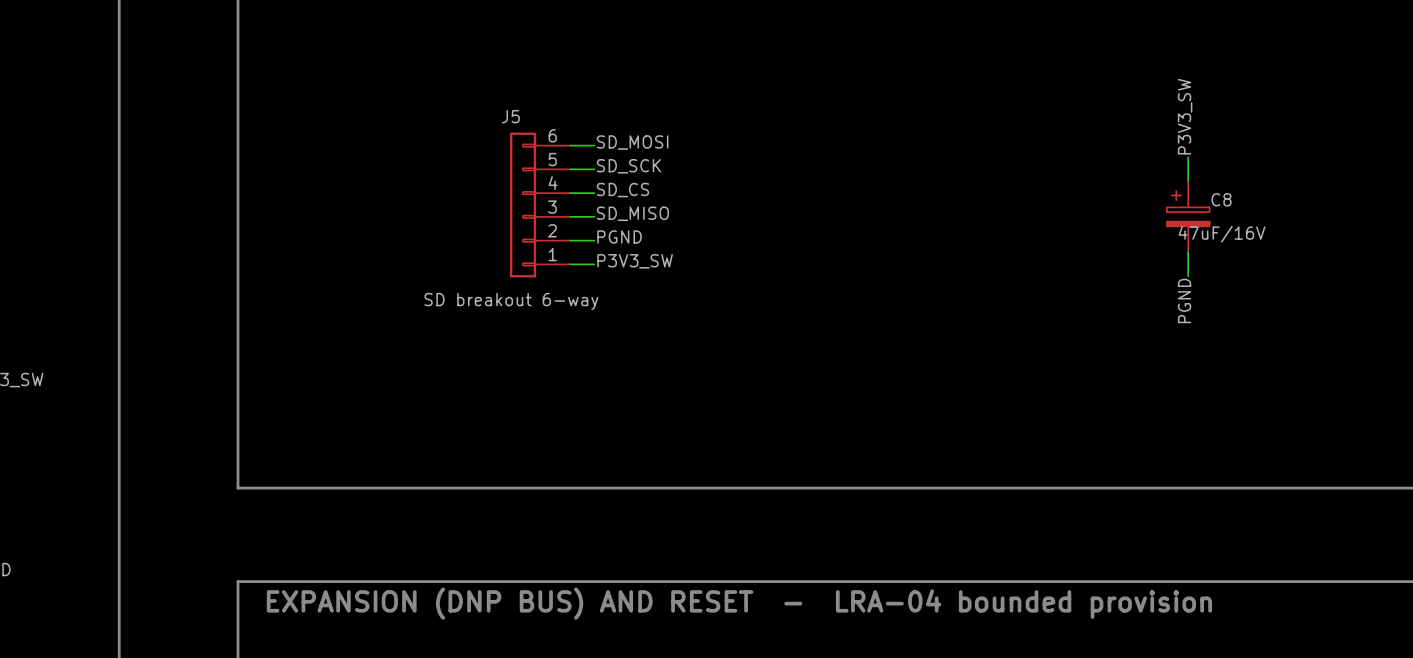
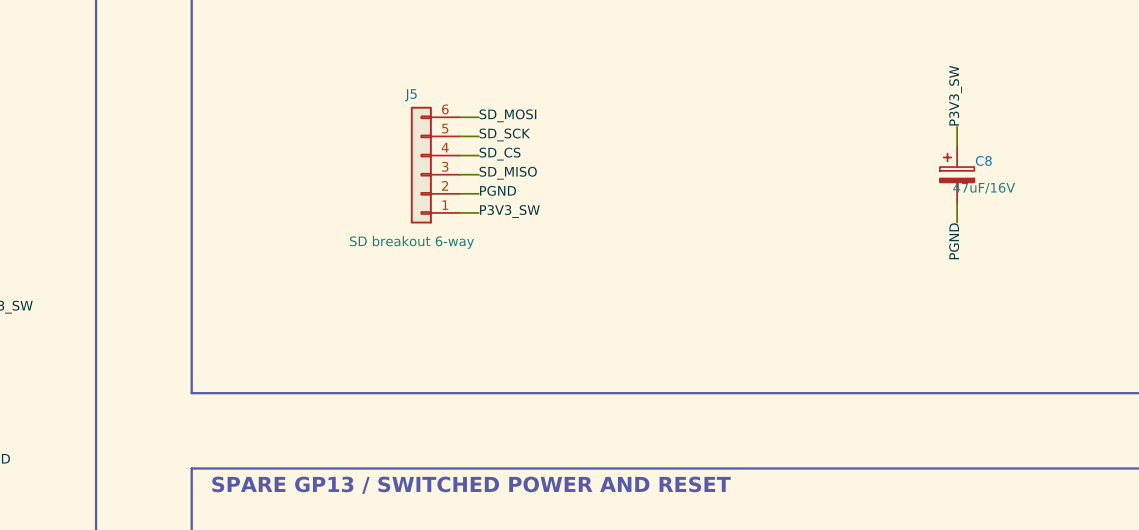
text: EXPANSION (DNP BUS) AND RESET - LRA-04 bounded provision (739, 603) -> SPARE GP13 / SWITCHED POWER AND RESET (471, 485)

